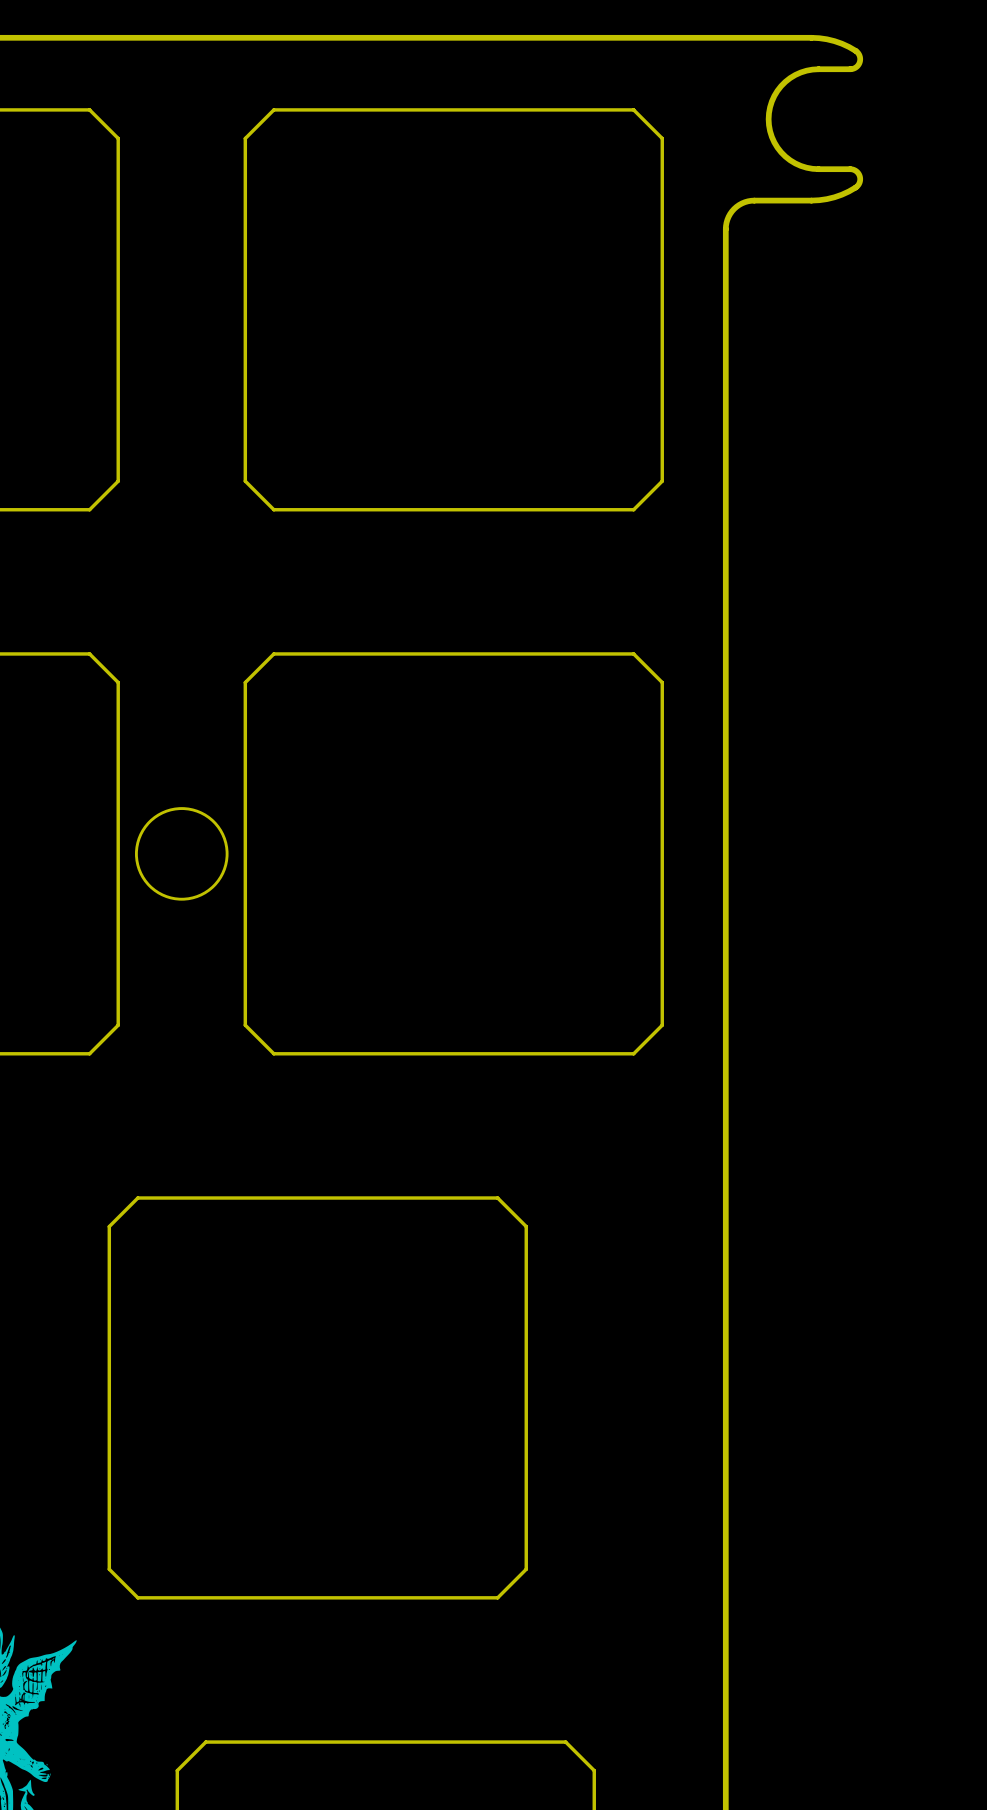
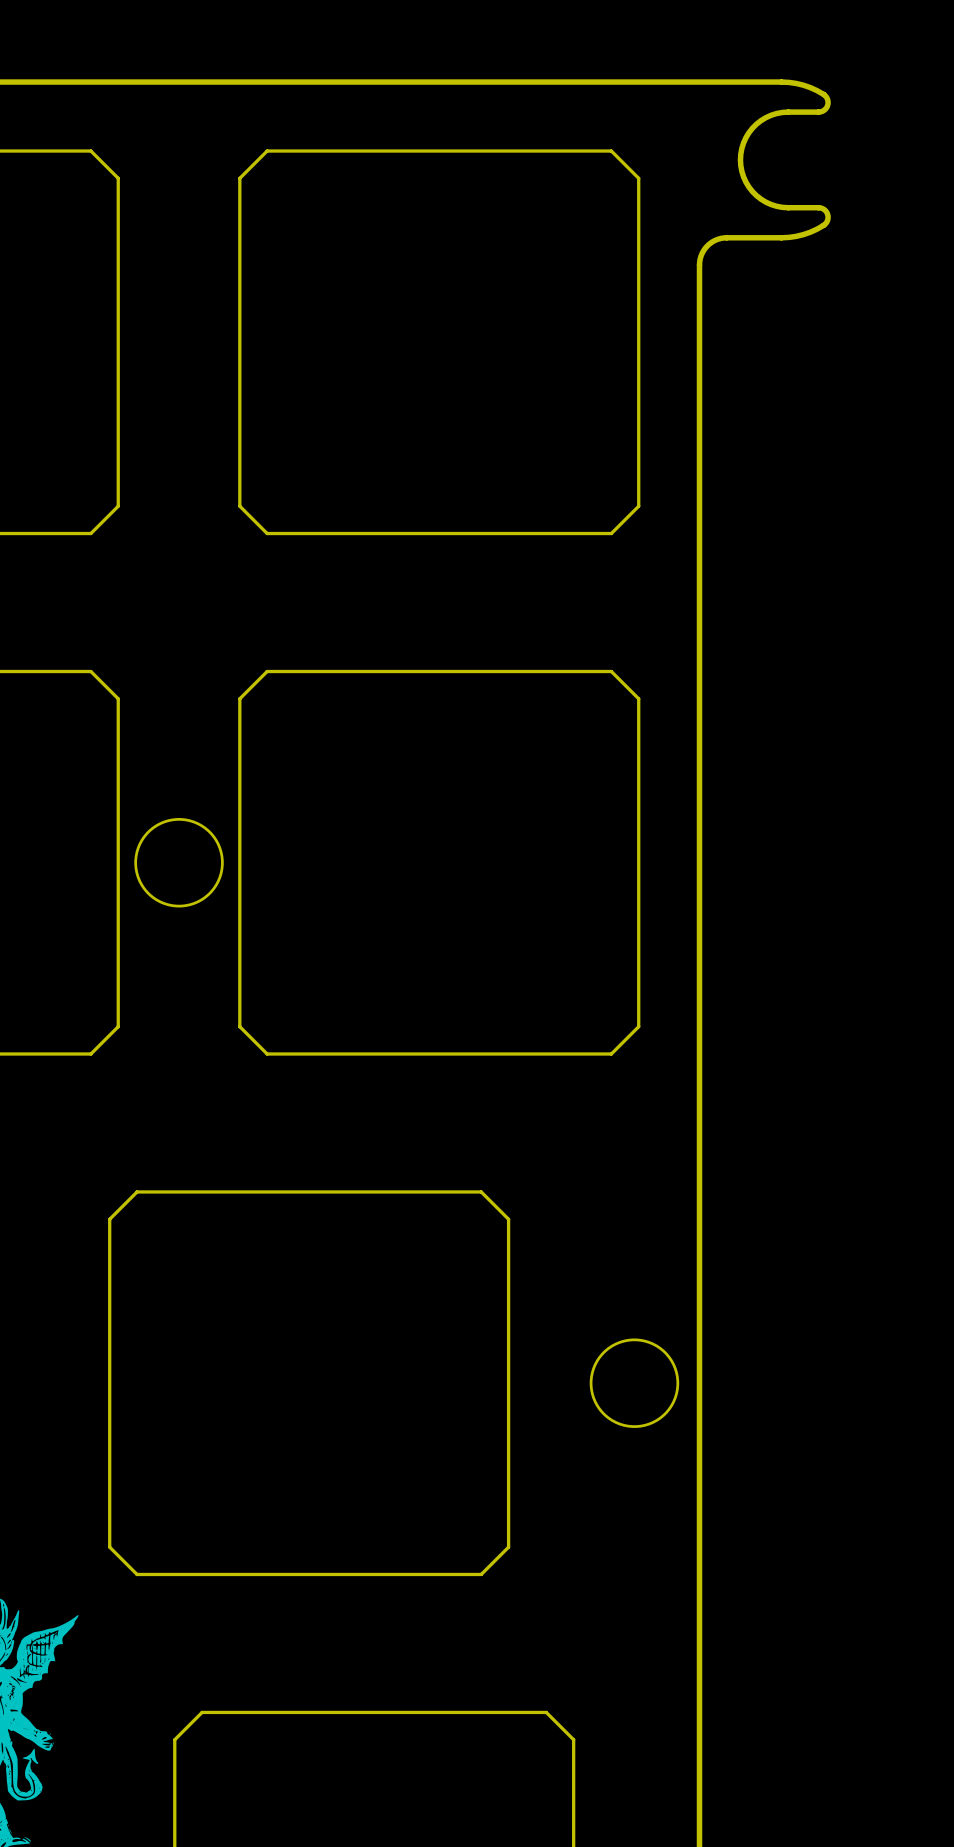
round board edge: none -> [589, 1338, 680, 1428]

